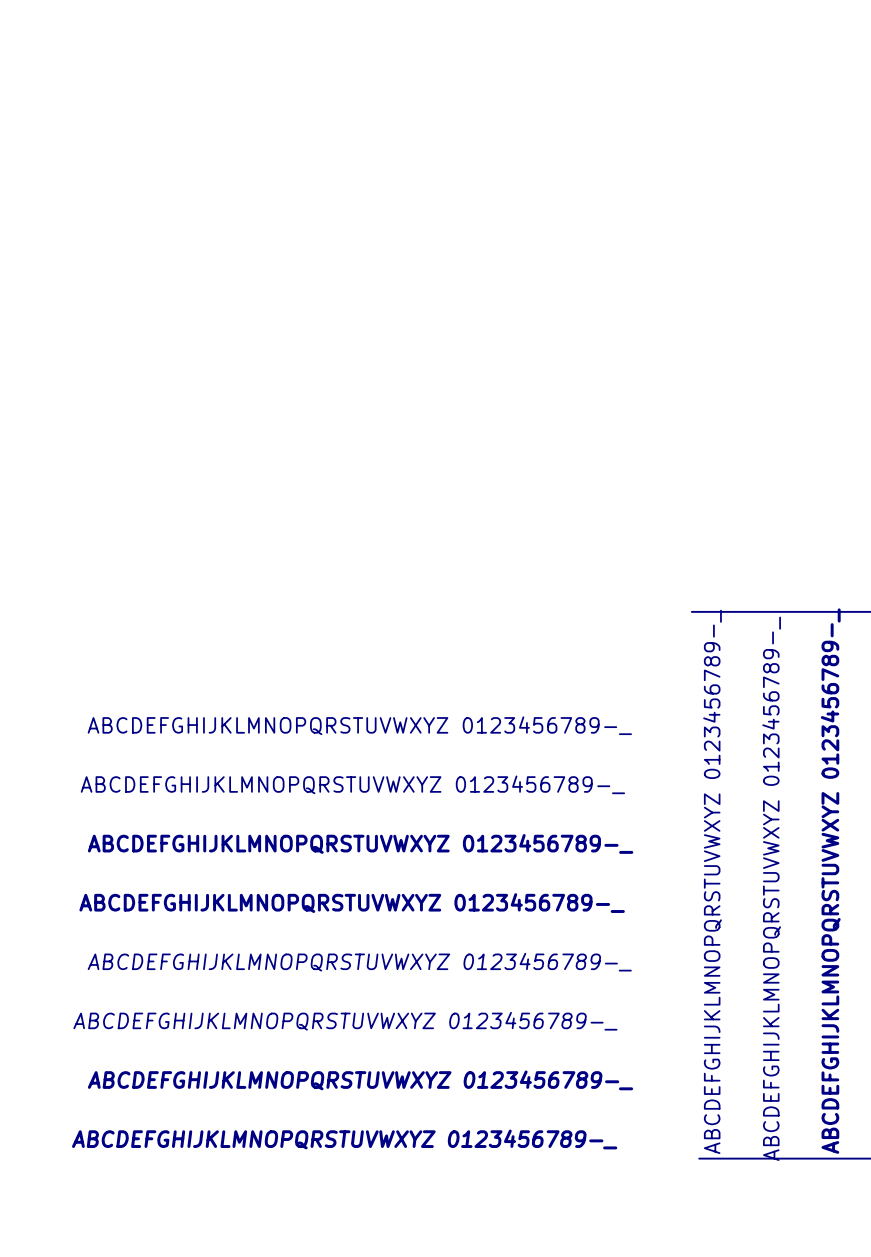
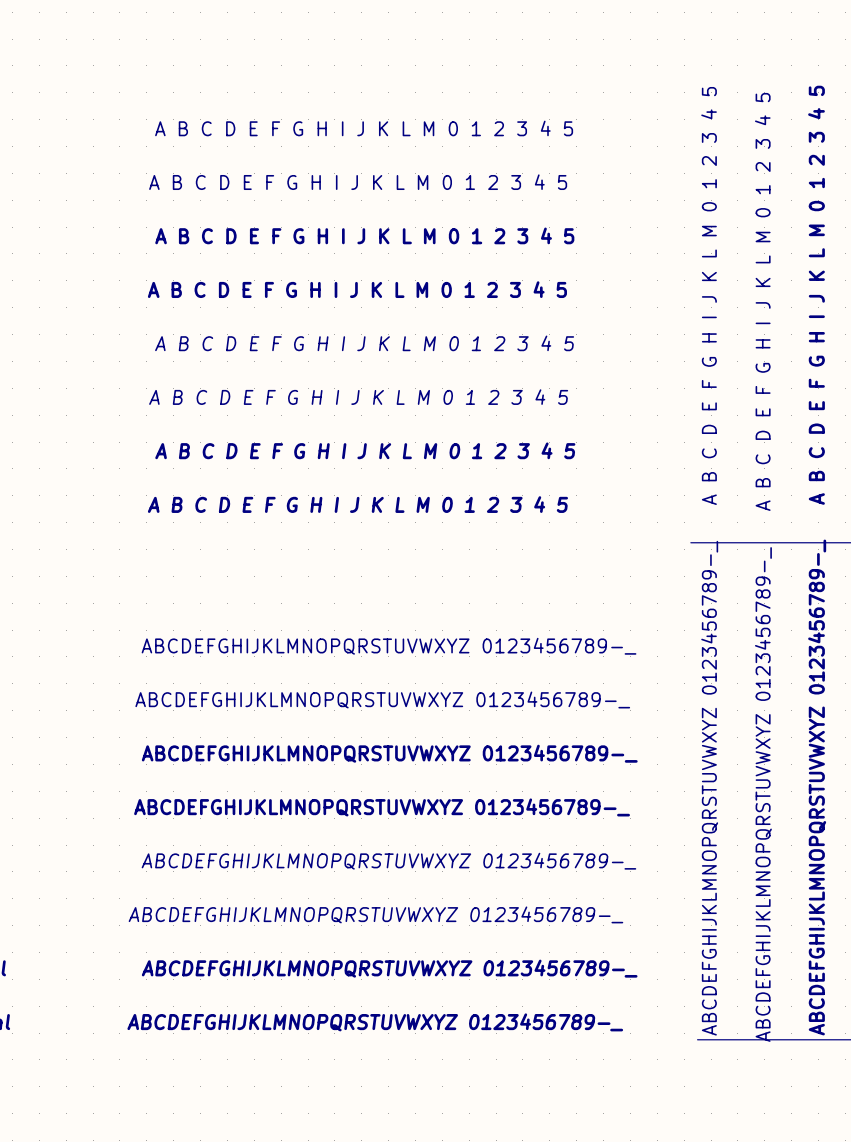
text: none -> A B C D E F G H I J K L M 0 1 2 3 4 5 (364, 128)
text: none -> A B C D E F G H I J K L M 0 1 2 3 4 5 (358, 182)
text: none -> A B C D E F G H I J K L M 0 1 2 3 4 5 (364, 235)
text: none -> A B C D E F G H I J K L M 0 1 2 3 4 5 (357, 289)
text: none -> A B C D E F G H I J K L M 0 1 2 3 4 5 (816, 295)
text: none -> A B C D E F G H I J K L M 0 1 2 3 4 5 (709, 295)
text: none -> A B C D E F G H I J K L M 0 1 2 3 4 5 (762, 301)
text: none -> A B C D E F G H I J K L M 0 1 2 3 4 5 (364, 343)
text: none -> A B C D E F G H I J K L M 0 1 2 3 4 5 (358, 397)
text: none -> A B C D E F G H I J K L M 0 1 2 3 4 5 (365, 450)
text: none -> A B C D E F G H I J K L M 0 1 2 3 4 5 (357, 504)

